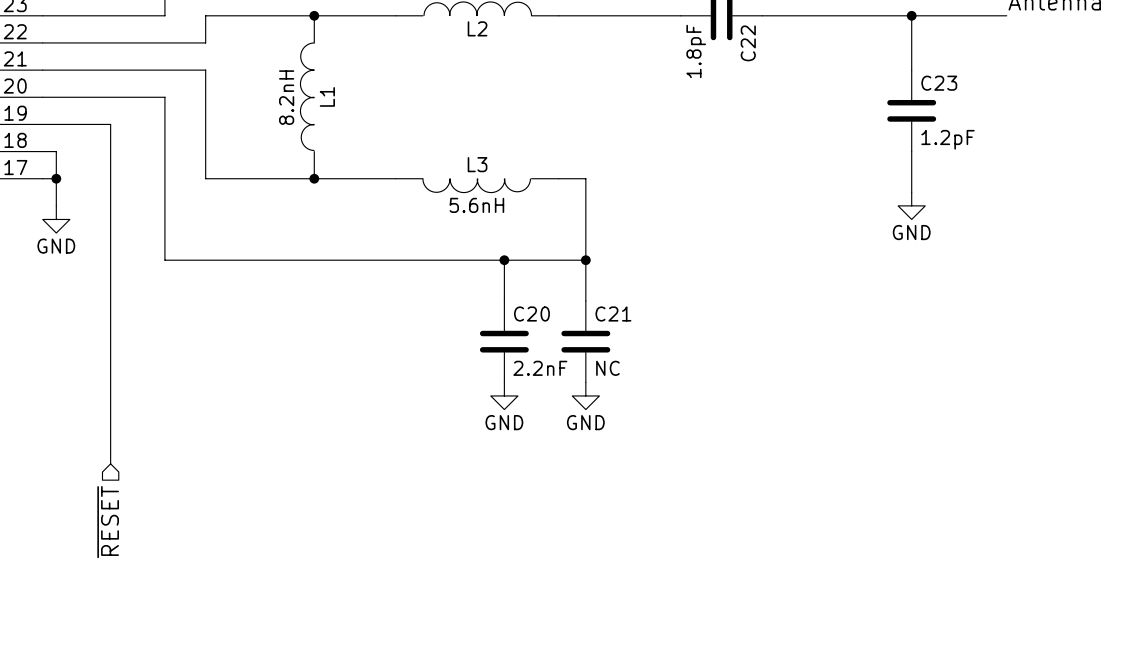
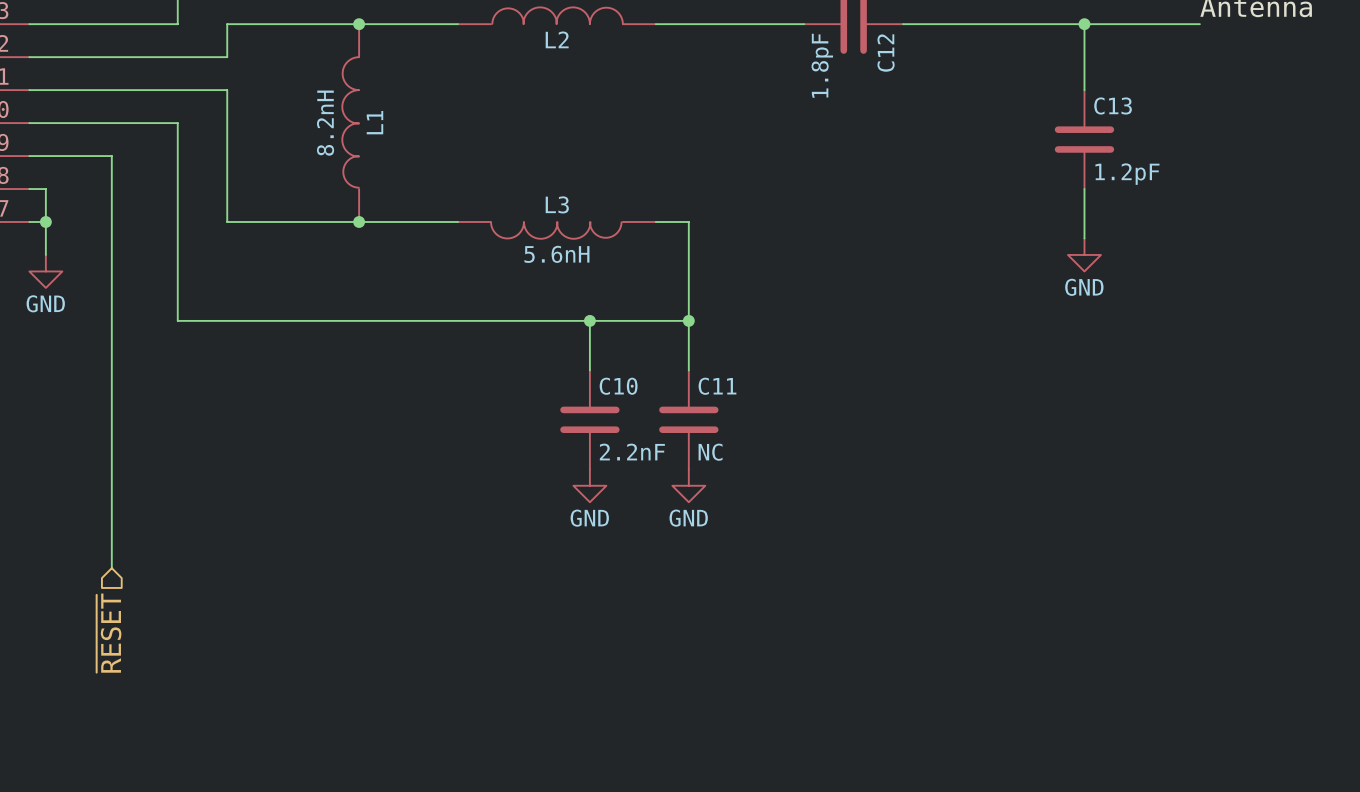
C22 name: C22 (748, 43) -> C12 (886, 53)
C23 name: C23 (939, 83) -> C13 (1113, 105)
C20 name: C20 (531, 314) -> C10 (618, 386)
C21 name: C21 (613, 314) -> C11 (717, 386)

